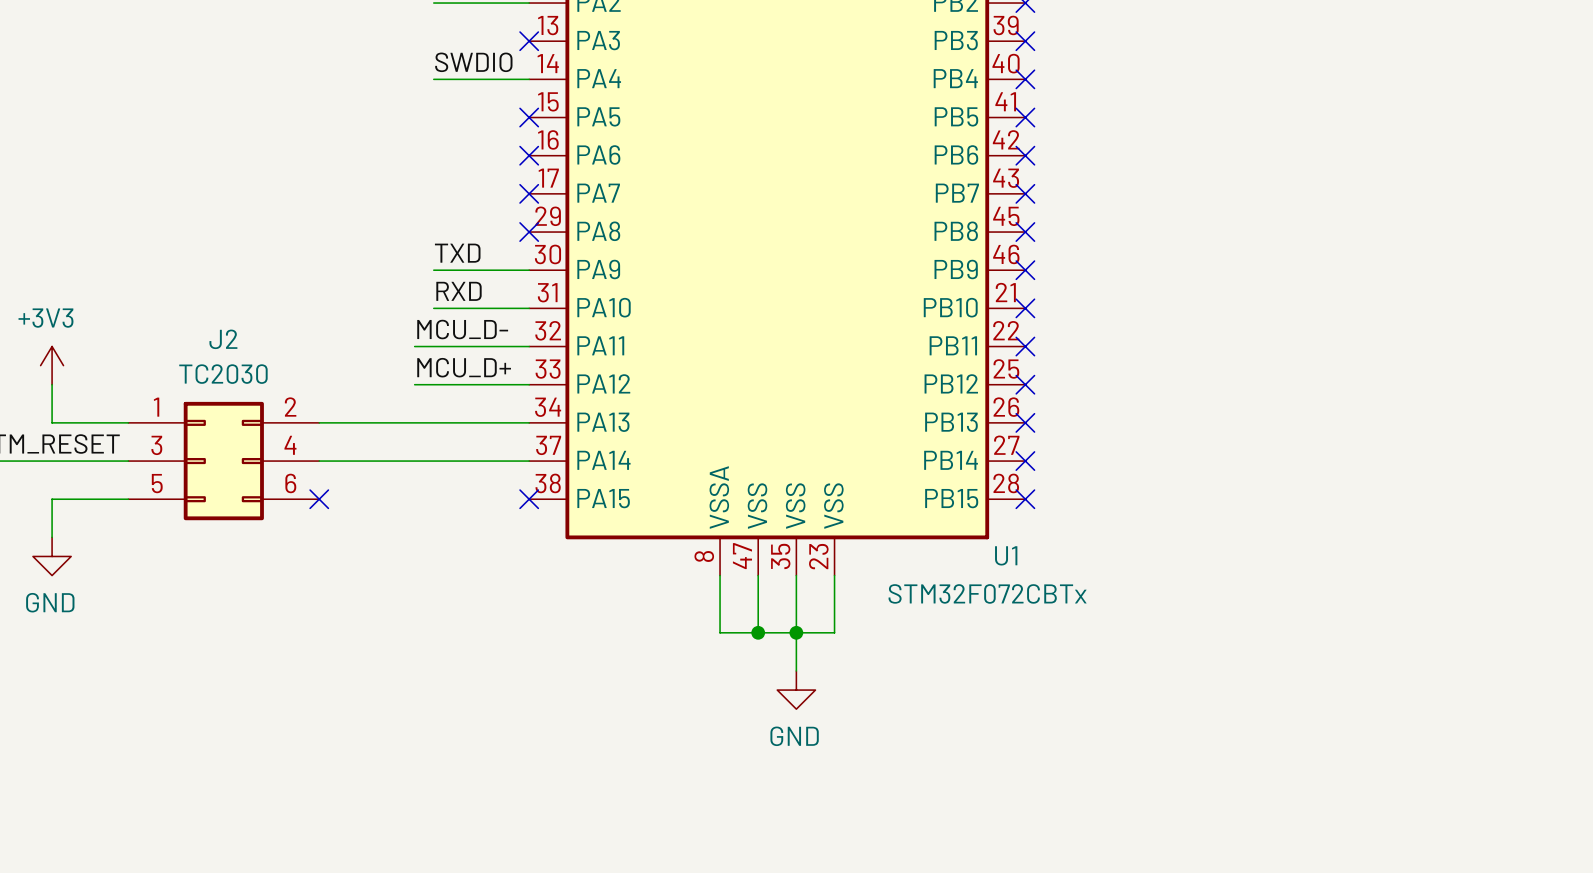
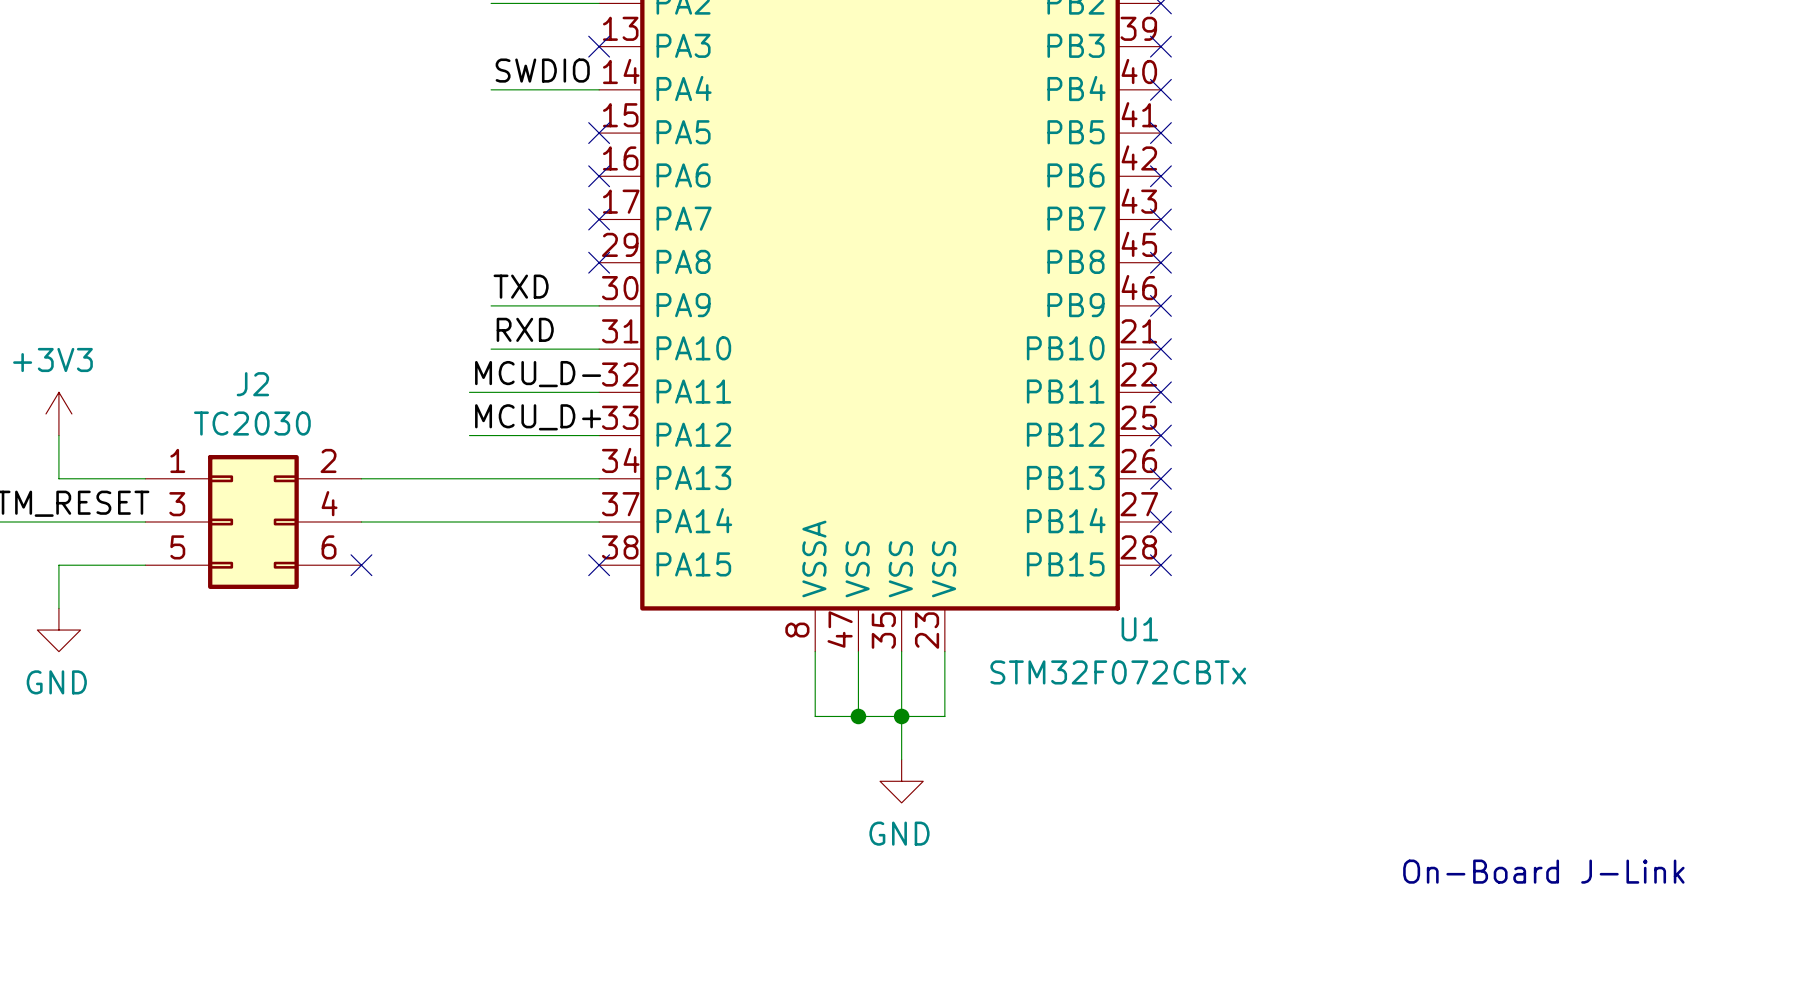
text: none -> On-Board J-Link (1543, 871)

